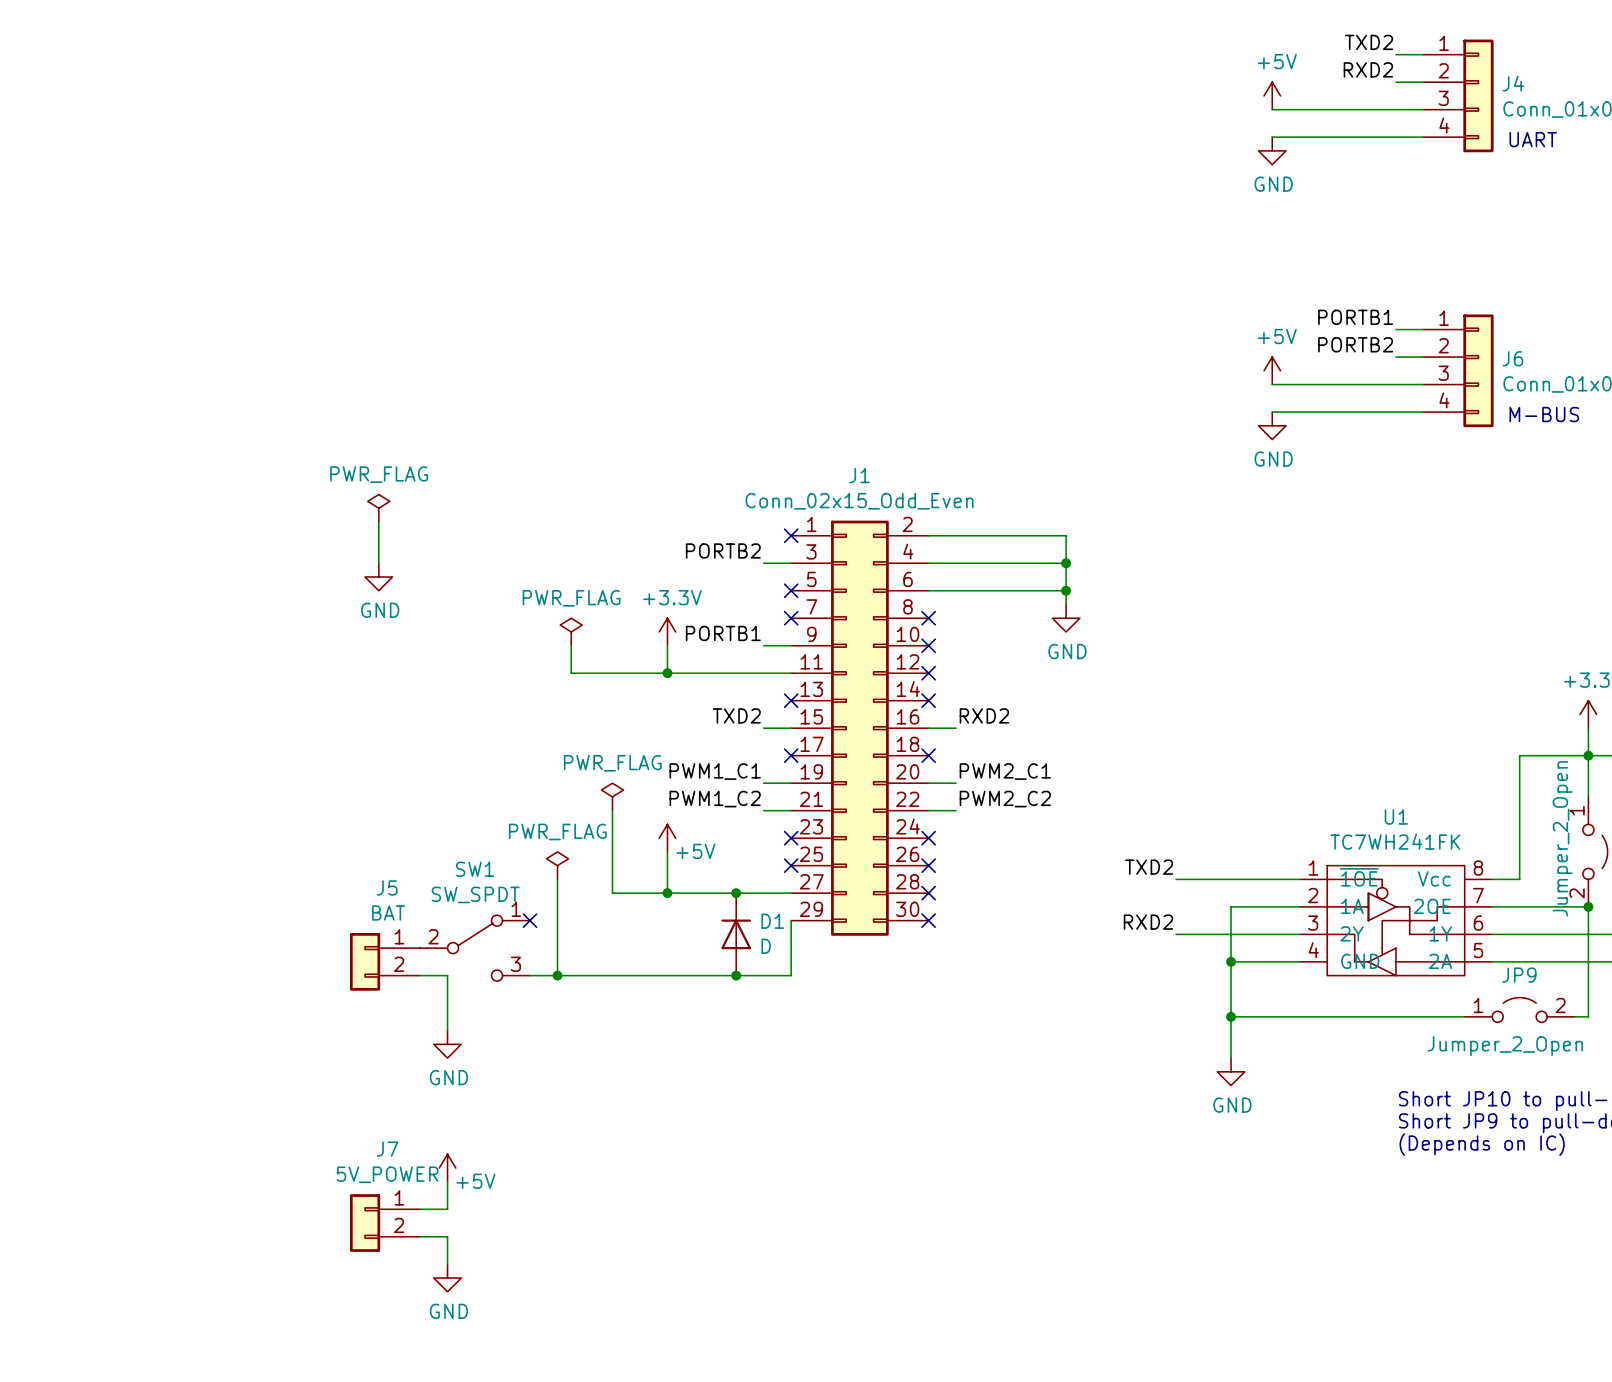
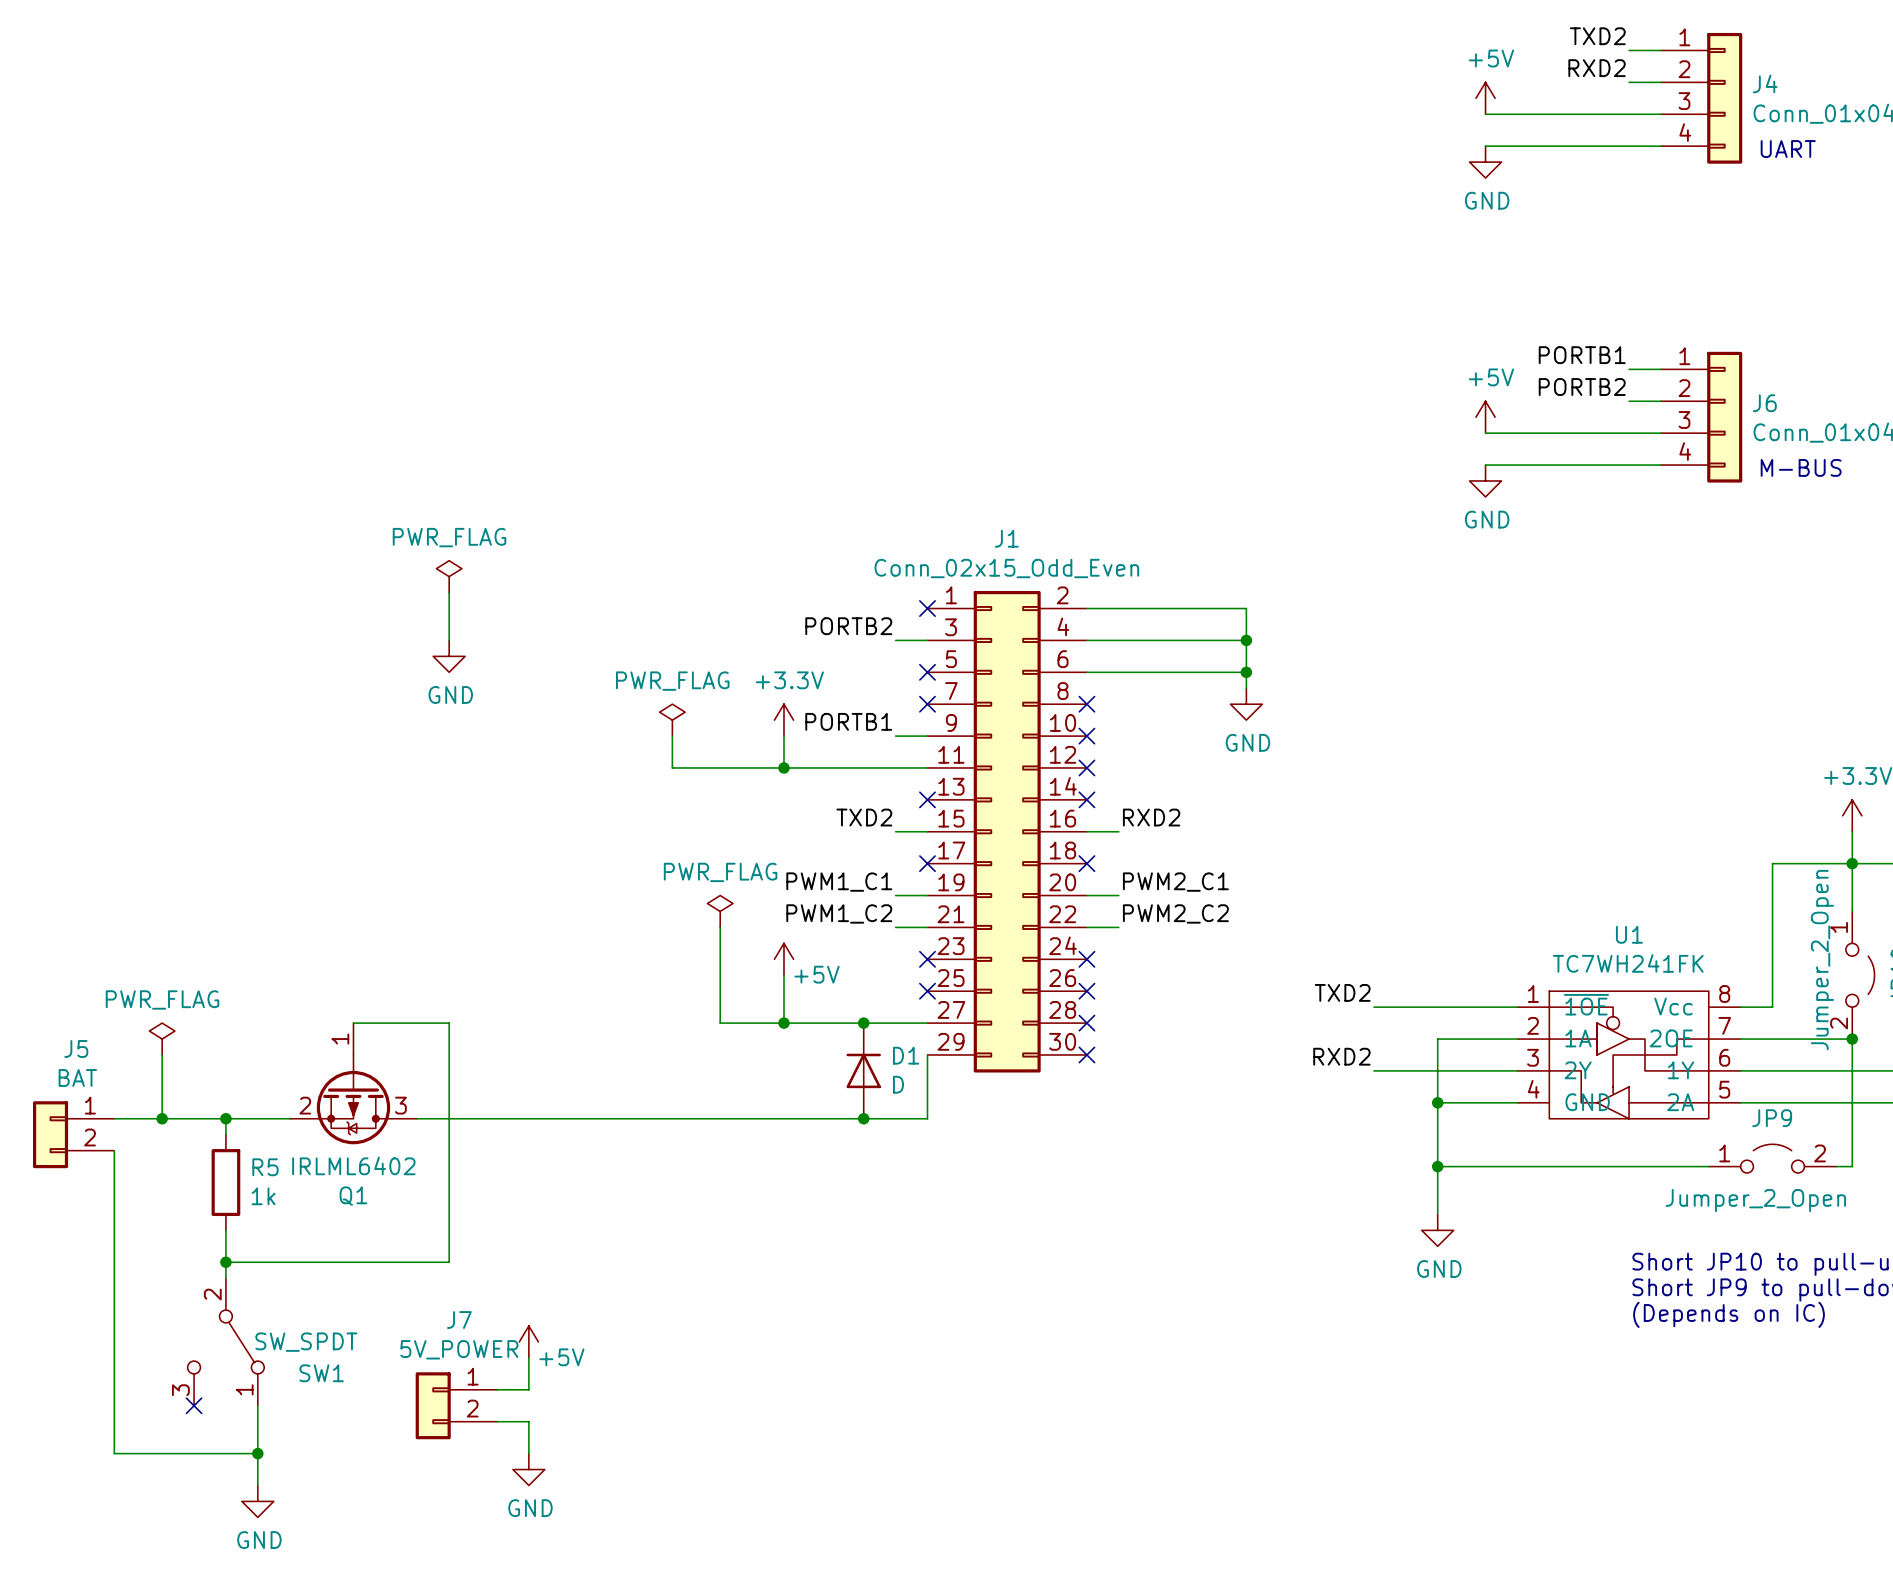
power symbol: PWR_FLAG (557, 865) -> none
SW1 name position: SW1 (475, 869) -> SW1 (321, 1373)
wire: (557, 879) (557, 975) -> none
wire: none -> (353, 1023) (449, 1023) (449, 1262) (225, 1262)
power symbol: none -> PWR_FLAG (162, 1039)
wire: none -> (162, 1054) (162, 1118)
no-connect mark: (530, 920) -> none
Q1: none -> IRLML6402 (353, 1083)
SW1 rotation: 0° (475, 948) -> 90° clockwise (225, 1341)
SW1 position: (475, 948) -> (225, 1341)
J5 position: (385, 961) -> (73, 1134)
wire: none -> (114, 1118) (289, 1118)
junction: none -> (162, 1118)
wire: none -> (225, 1118) (225, 1134)
junction: none -> (225, 1118)
wire: (447, 975) (447, 1030) -> (528, 1118) (624, 1118)
junction: (557, 975) -> none
wire: none -> (114, 1150) (114, 1453) (257, 1453)
R5: none -> 1k (225, 1182)
power symbol: GND (447, 1044) -> none
wire: none -> (225, 1230) (225, 1278)
junction: none -> (225, 1262)
no-connect mark: none -> (194, 1405)
wire: none -> (257, 1405) (257, 1485)
junction: none -> (257, 1453)
power symbol: none -> GND (257, 1501)

